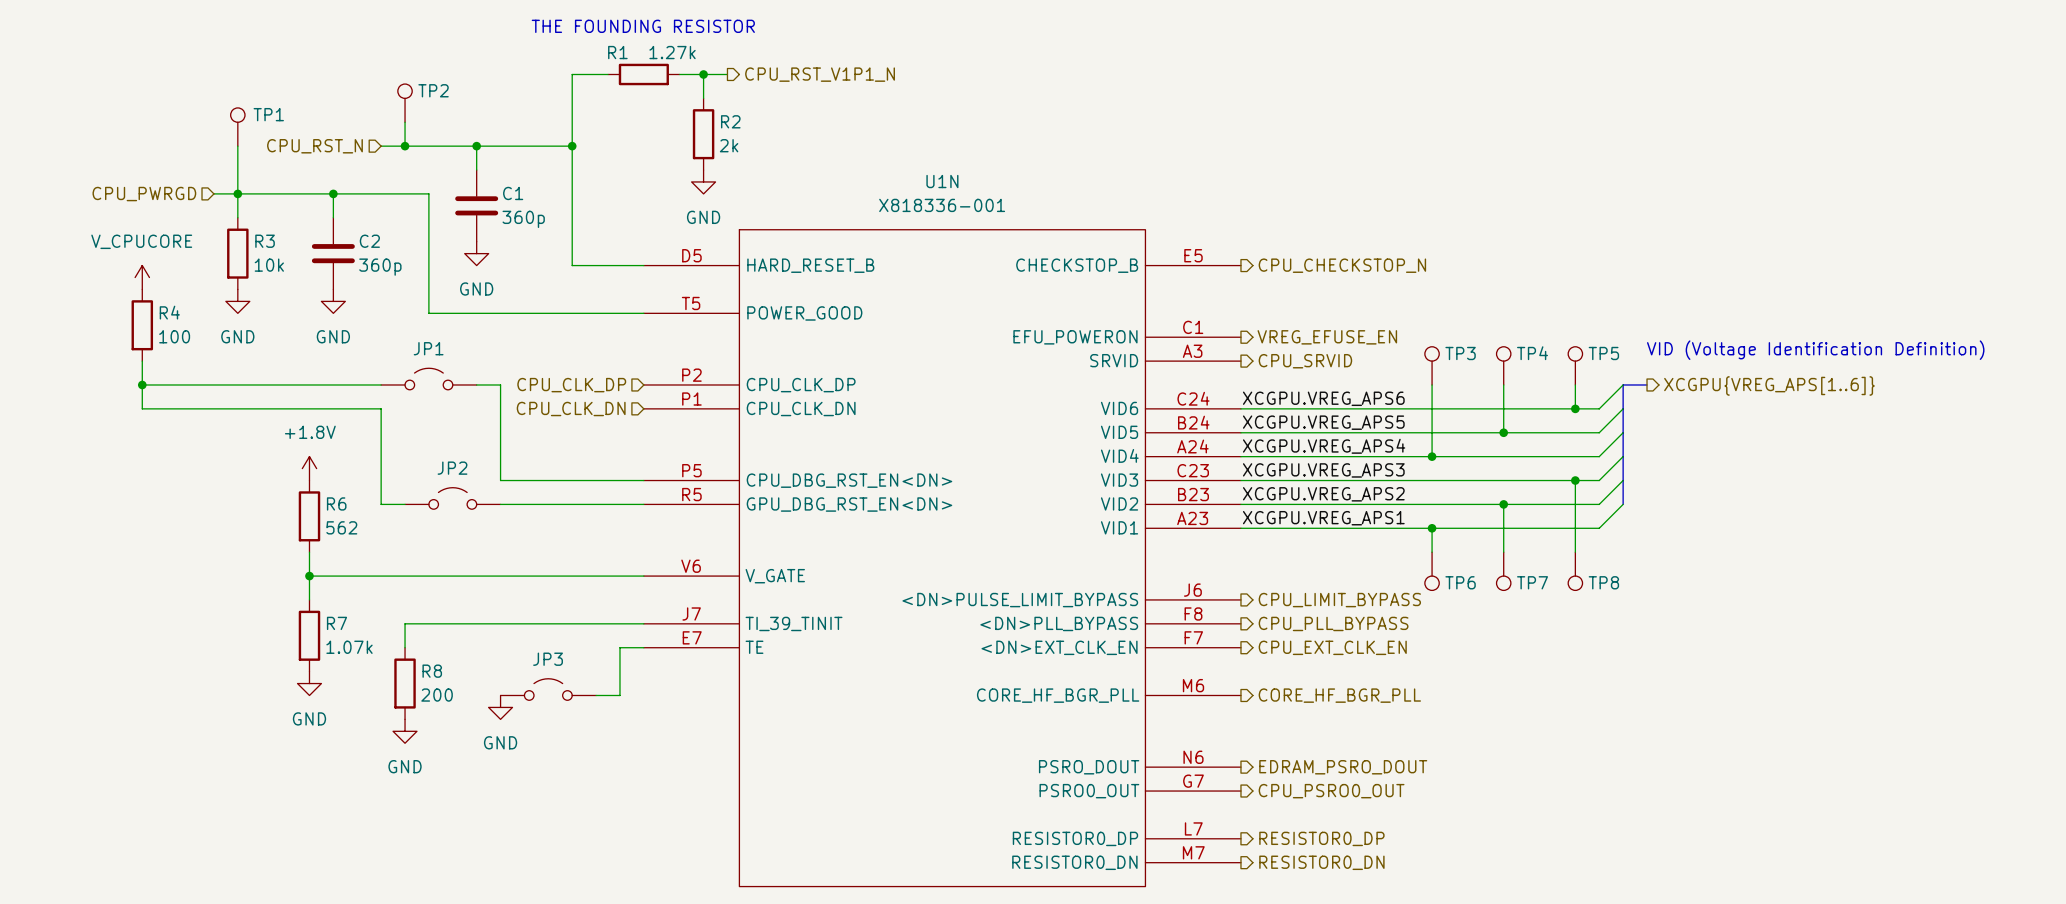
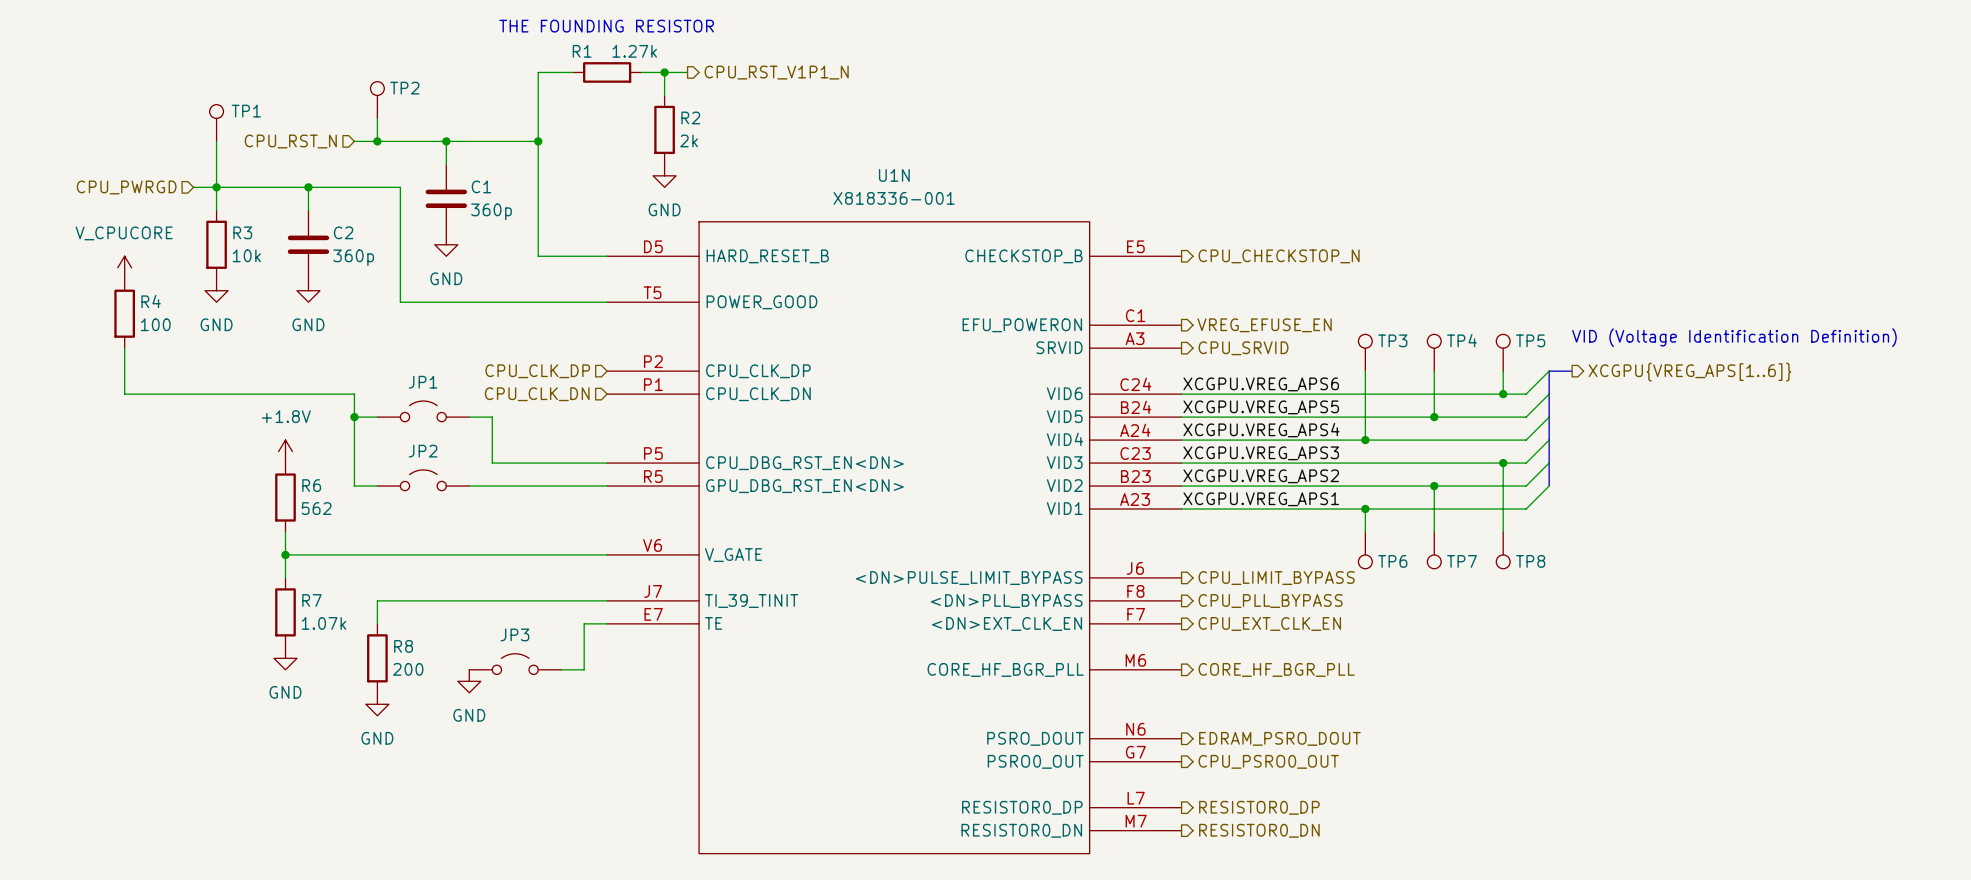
JP1 position: (428, 379) -> (423, 411)
wire: (142, 384) (381, 384) -> none
junction: (142, 384) -> none
wire: (476, 384) (500, 384) (500, 480) (524, 480) -> (469, 417) (492, 417) (492, 463)
wire: none -> (354, 417) (377, 417)
junction: none -> (354, 417)

